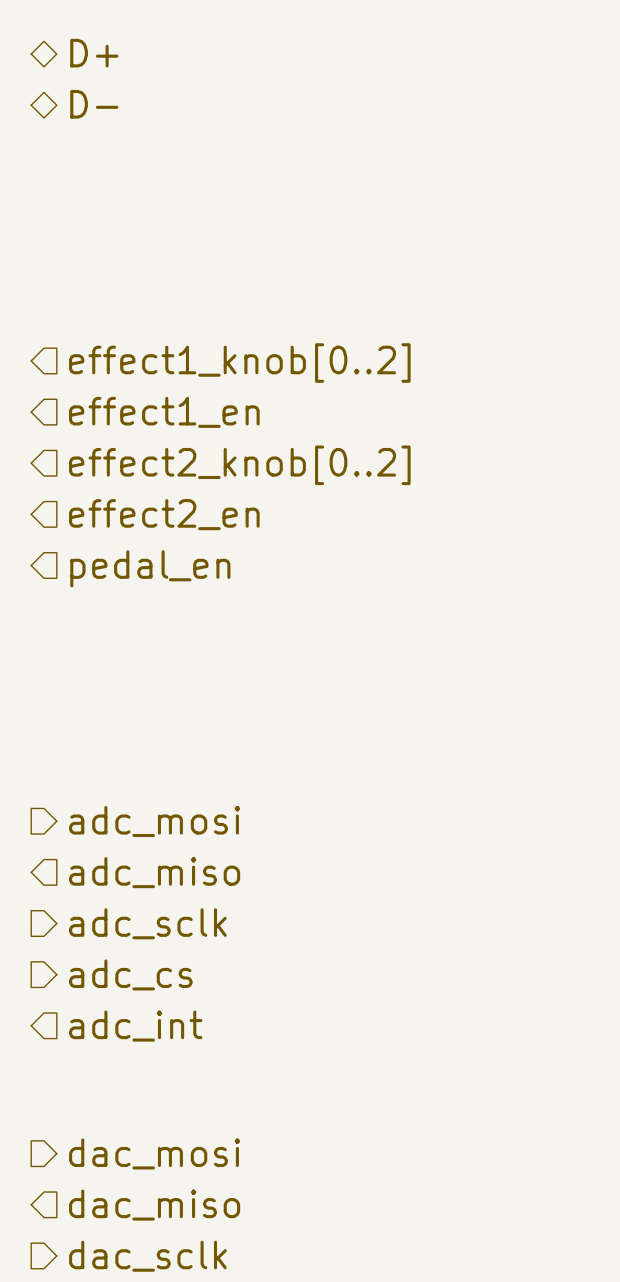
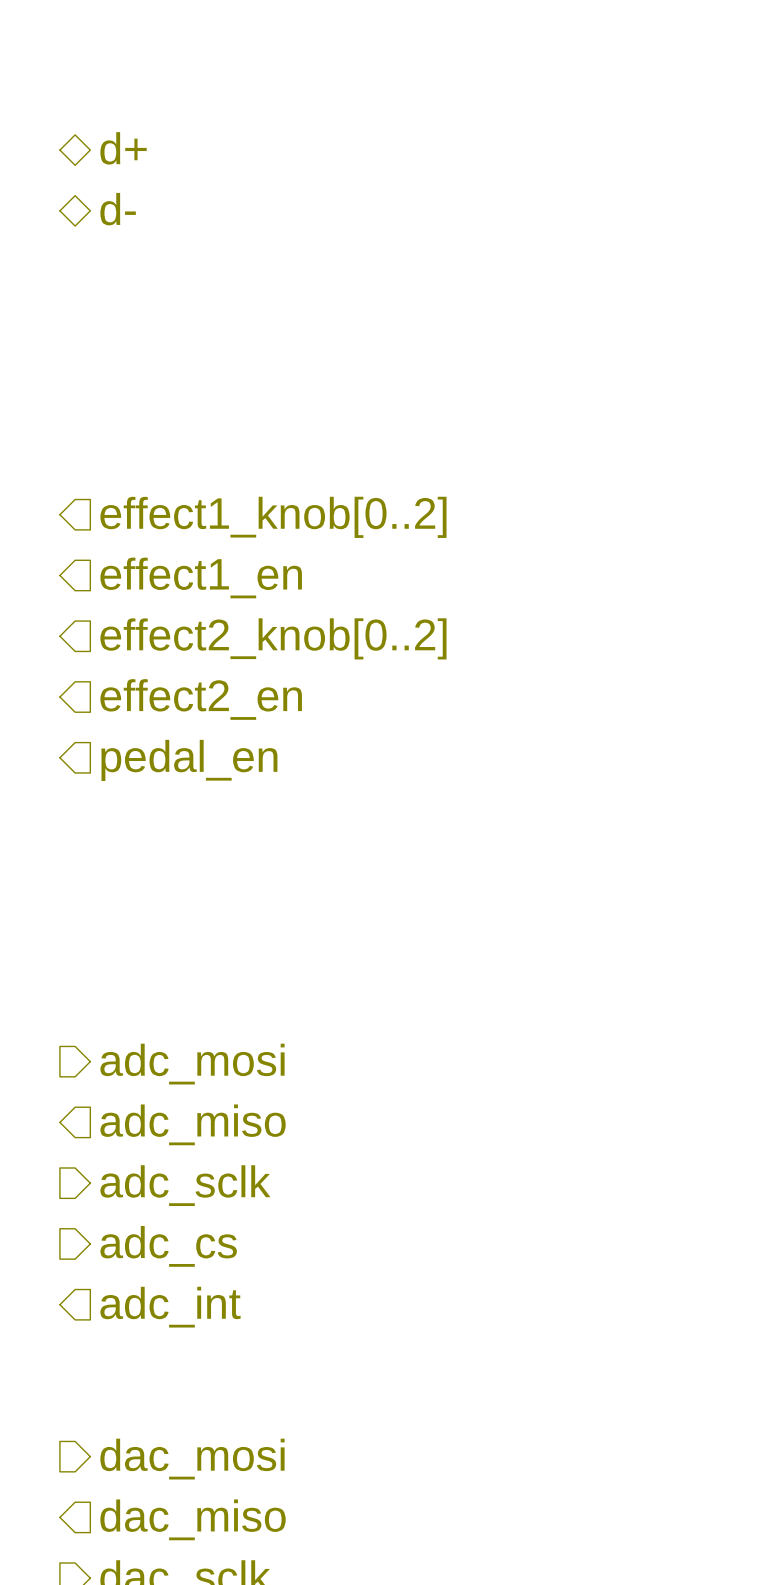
hierarchical label: D+ (94, 53) -> d+ (123, 148)
hierarchical label: D- (94, 104) -> d- (118, 209)

